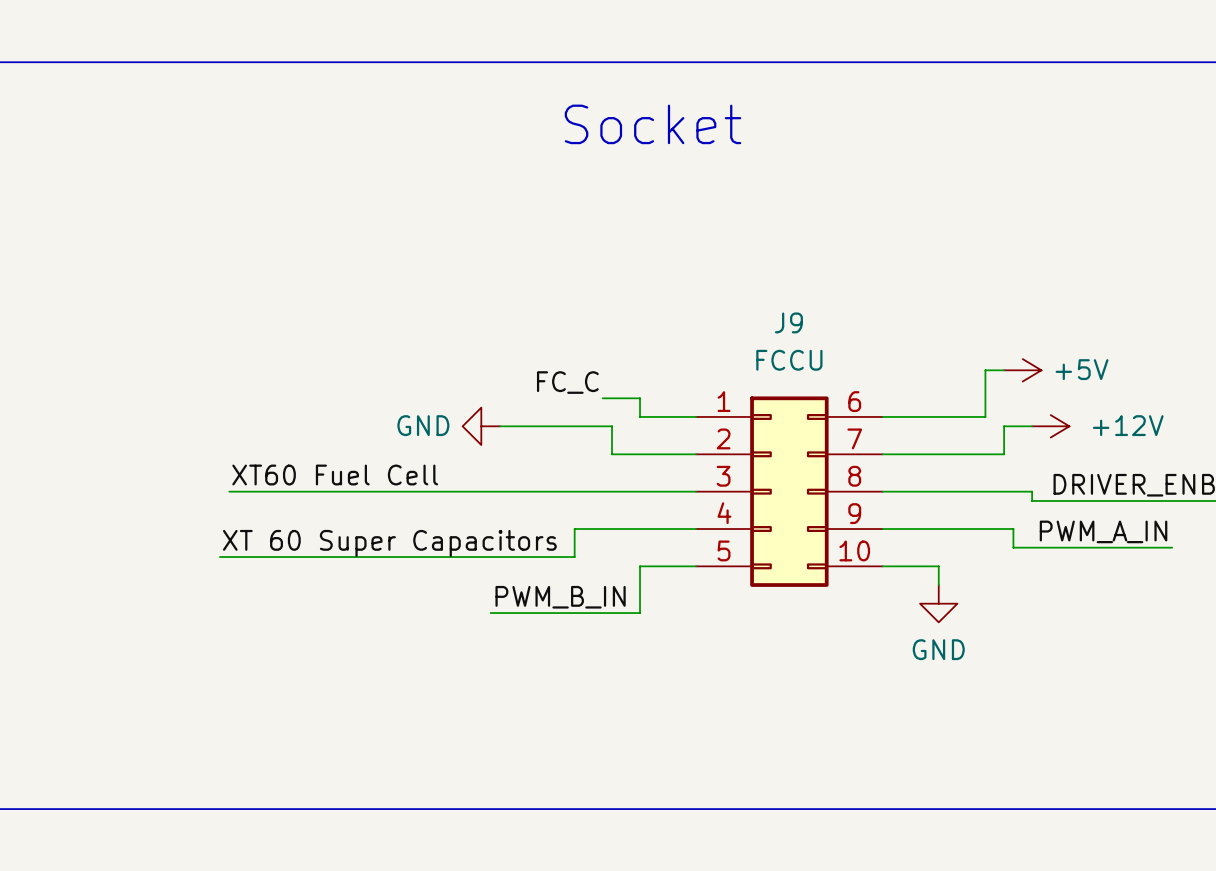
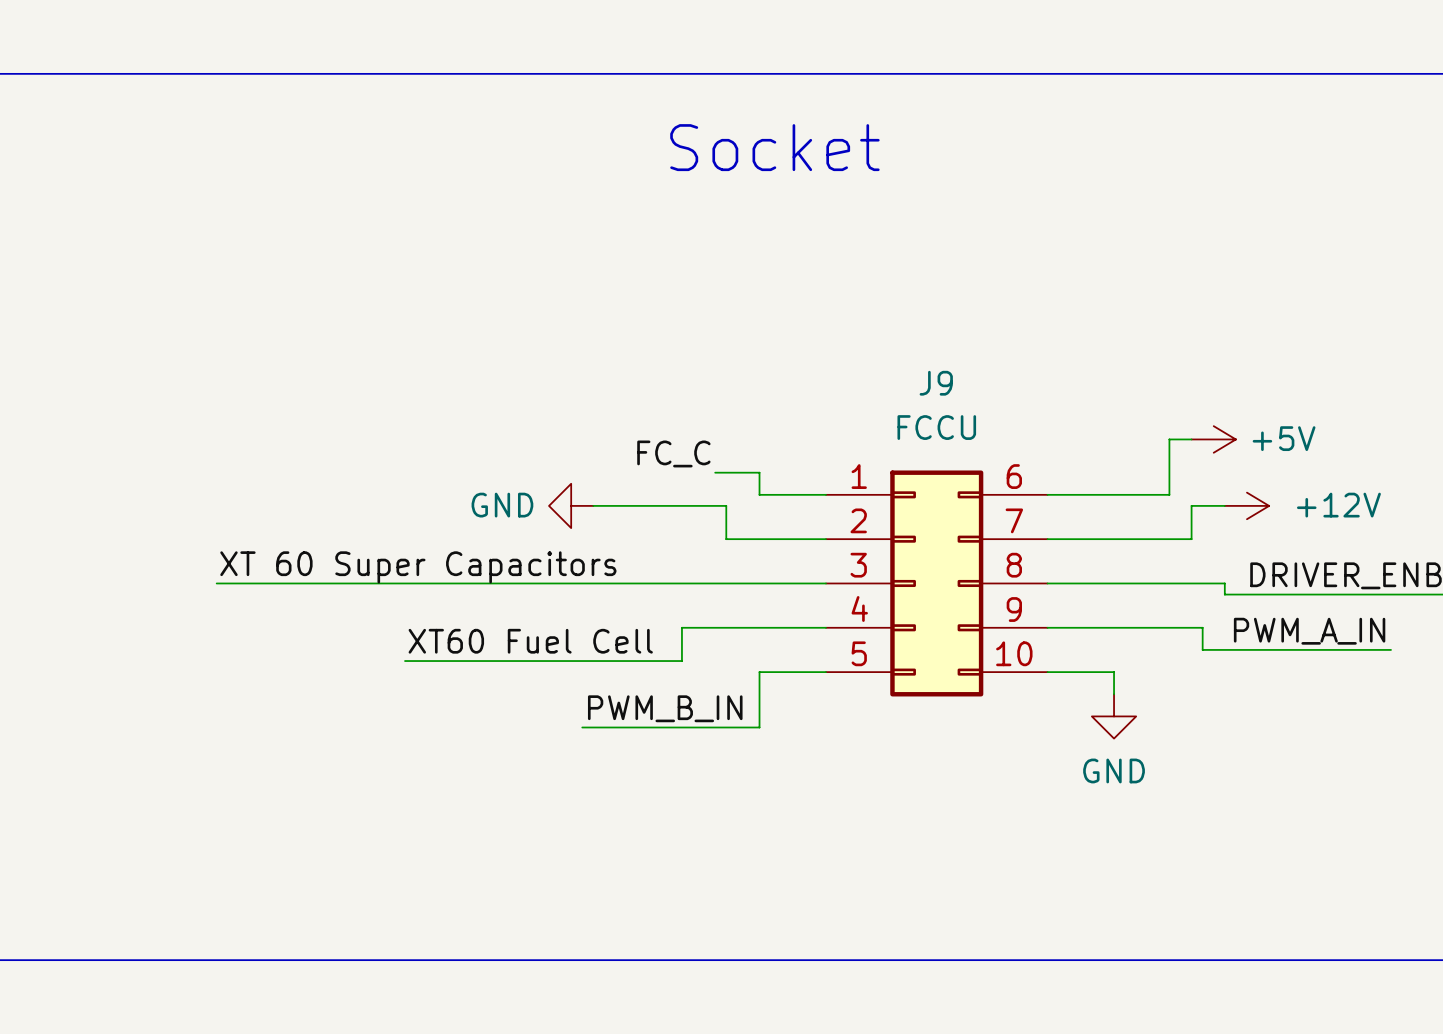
label position: XT60 Fuel Cell (335, 475) -> XT60 Fuel Cell (530, 641)
wire: none -> (216, 583) (272, 583)
label position: XT 60 Super Capacitors (389, 543) -> XT 60 Super Capacitors (418, 567)
wire: (219, 557) (341, 557) -> none

